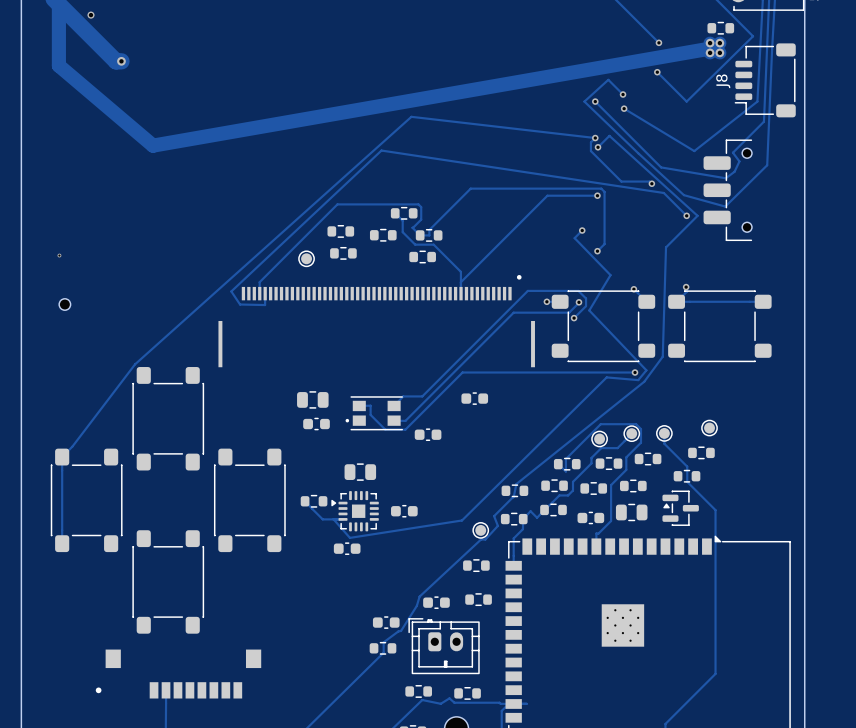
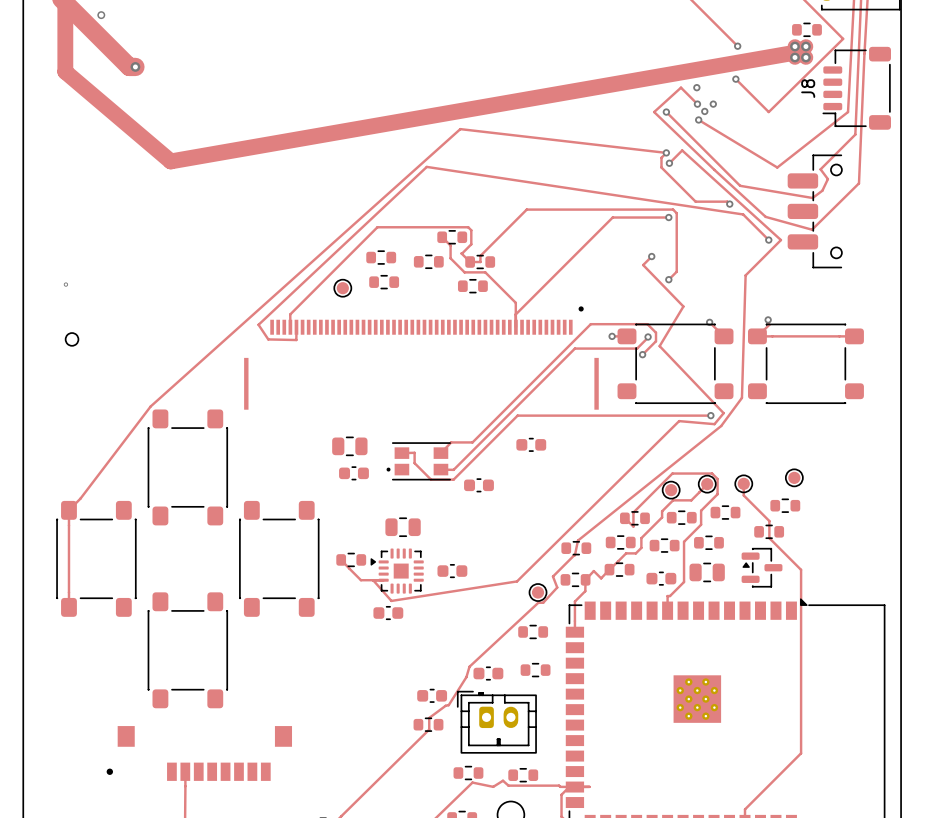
via: none -> (696, 87)
via: none -> (713, 104)
via: none -> (704, 111)

